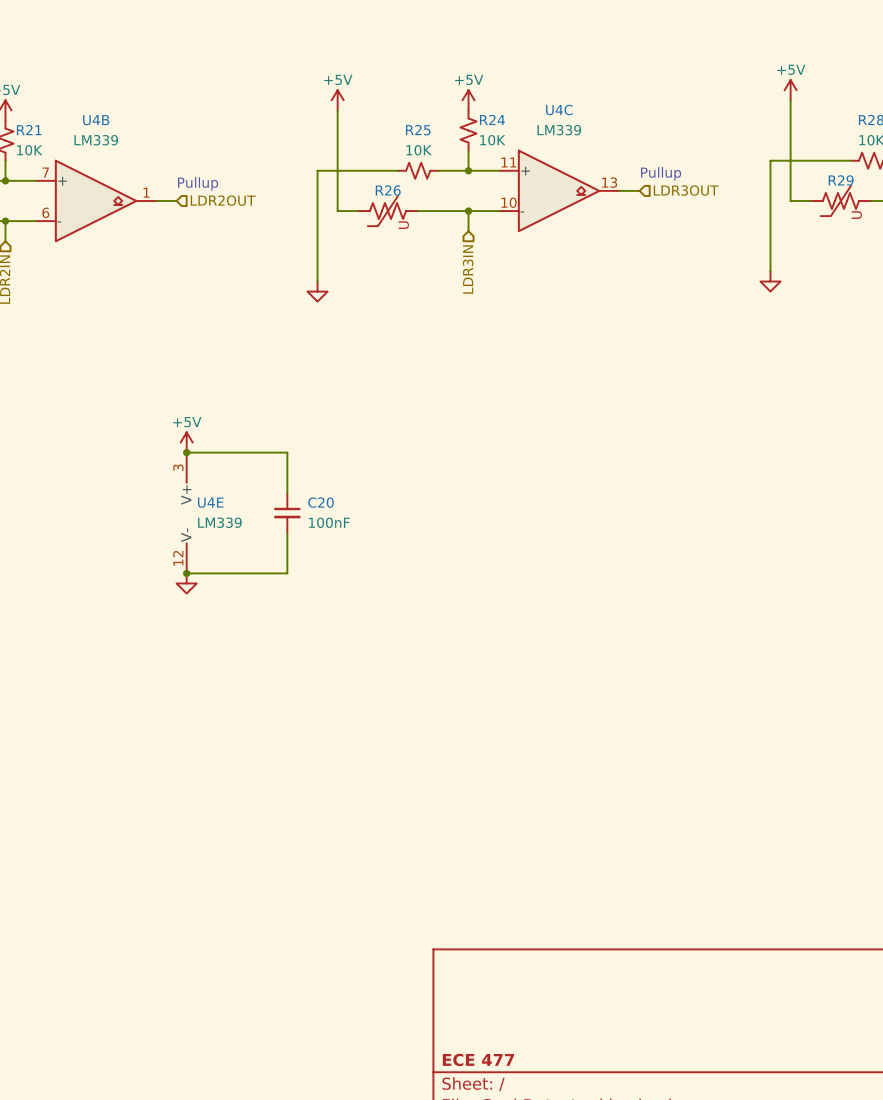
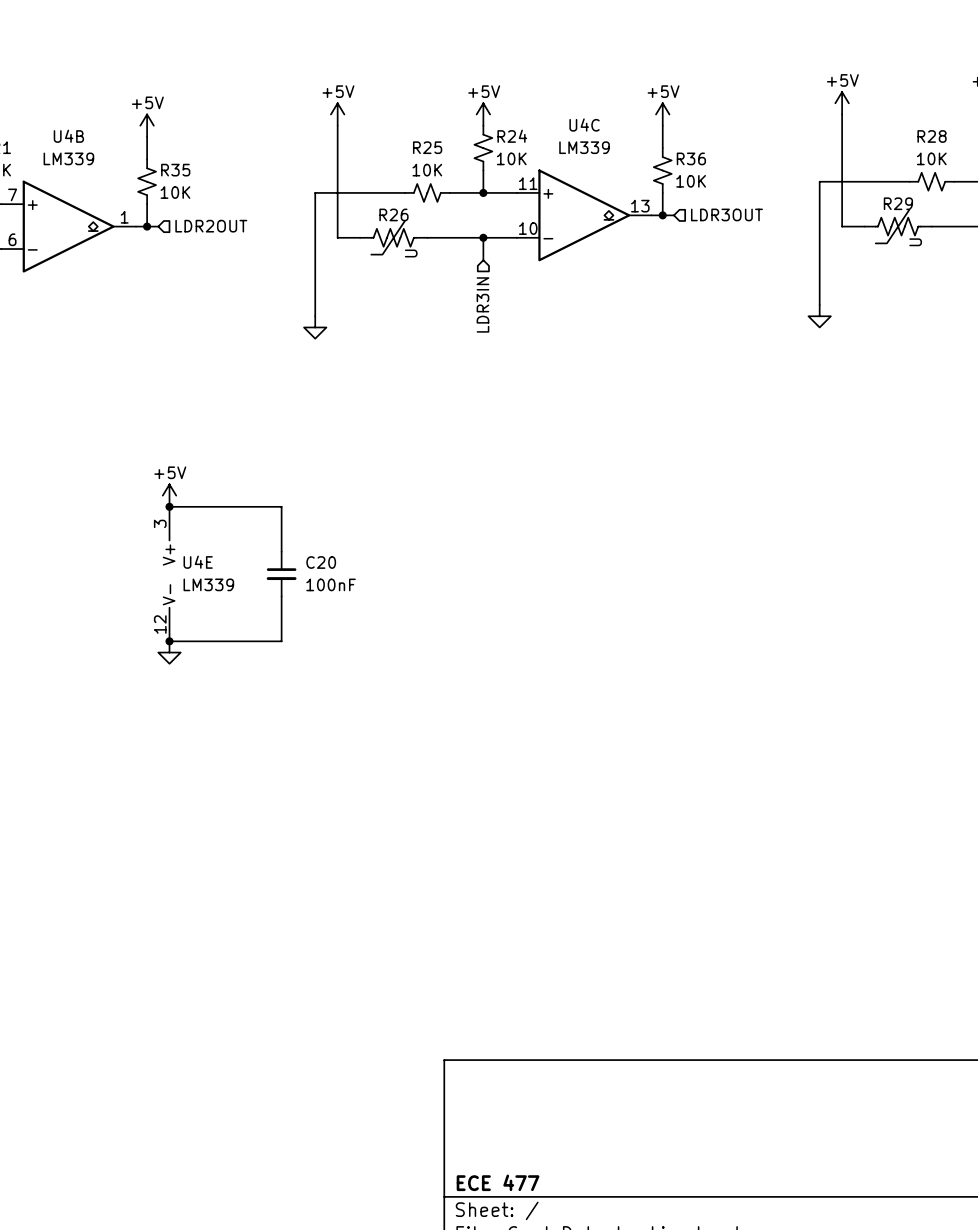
power symbol: none -> +5V (662, 114)
power symbol: none -> +5V (147, 125)
wire: none -> (662, 125) (662, 148)
wire: none -> (147, 136) (147, 159)
R36: none -> 10K (662, 170)
R35: none -> 10K (147, 181)
wire: none -> (662, 192) (662, 215)
text: Pullup (661, 173) -> none
wire: none -> (147, 204) (147, 226)
text: Pullup (198, 183) -> none
junction: none -> (662, 215)
junction: none -> (147, 226)

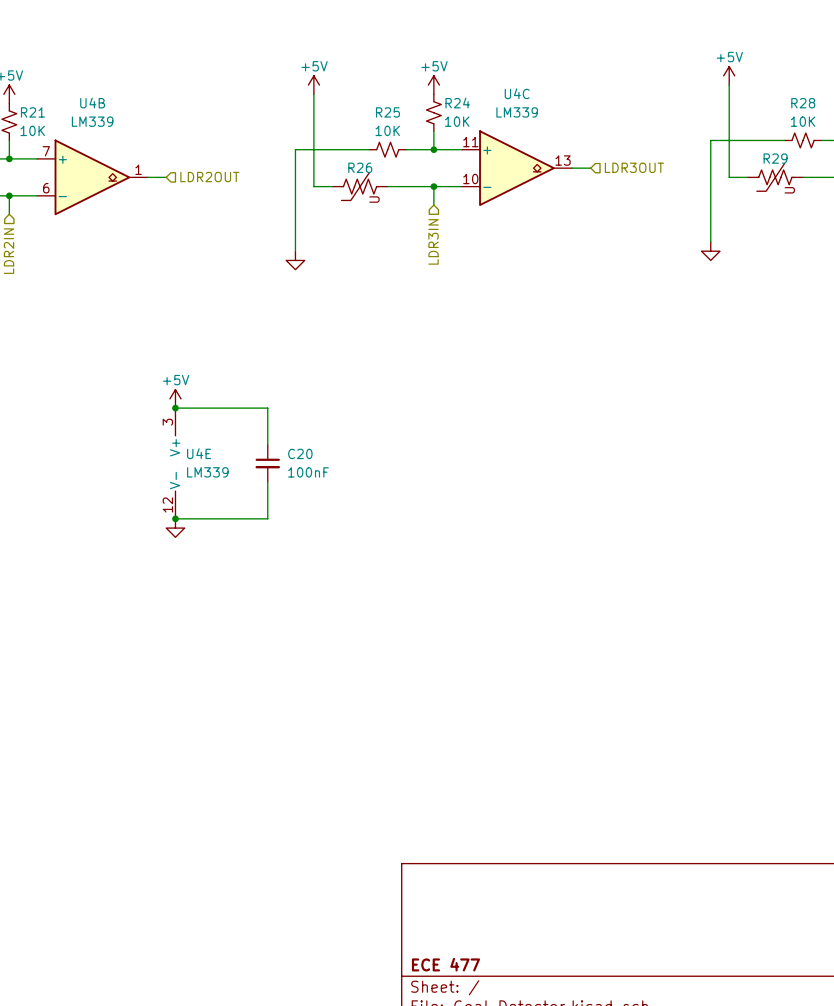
power symbol: +5V (662, 114) -> none
power symbol: +5V (147, 125) -> none
wire: (662, 125) (662, 148) -> none
wire: (147, 136) (147, 159) -> none
R36: 10K (662, 170) -> none
R35: 10K (147, 181) -> none
wire: (662, 192) (662, 215) -> none
wire: (147, 204) (147, 226) -> none
junction: (662, 215) -> none
junction: (147, 226) -> none

